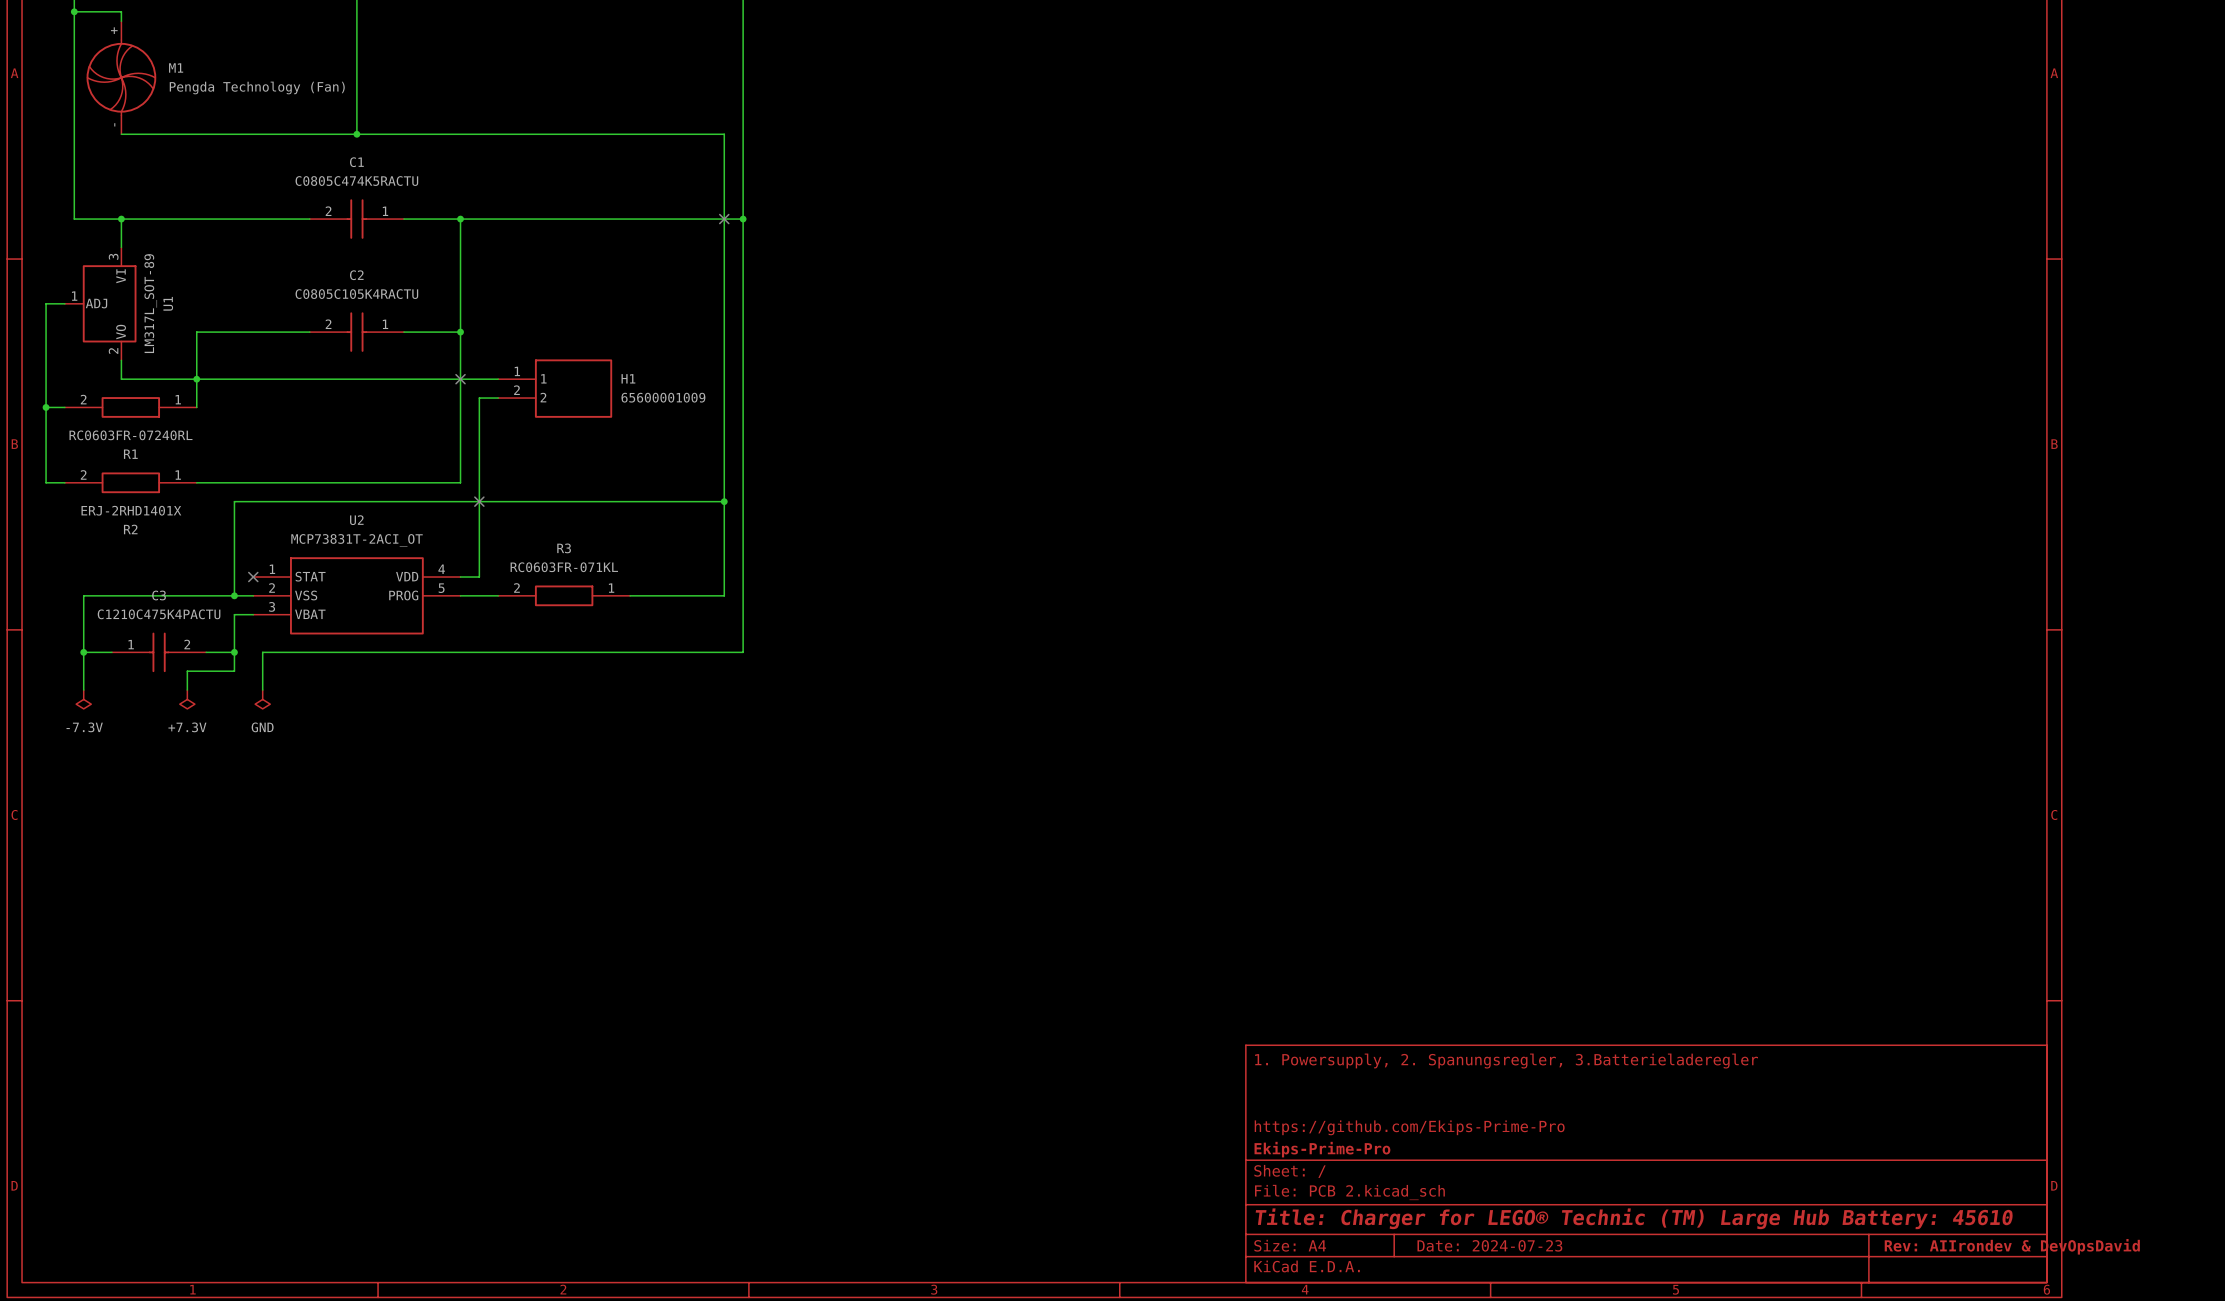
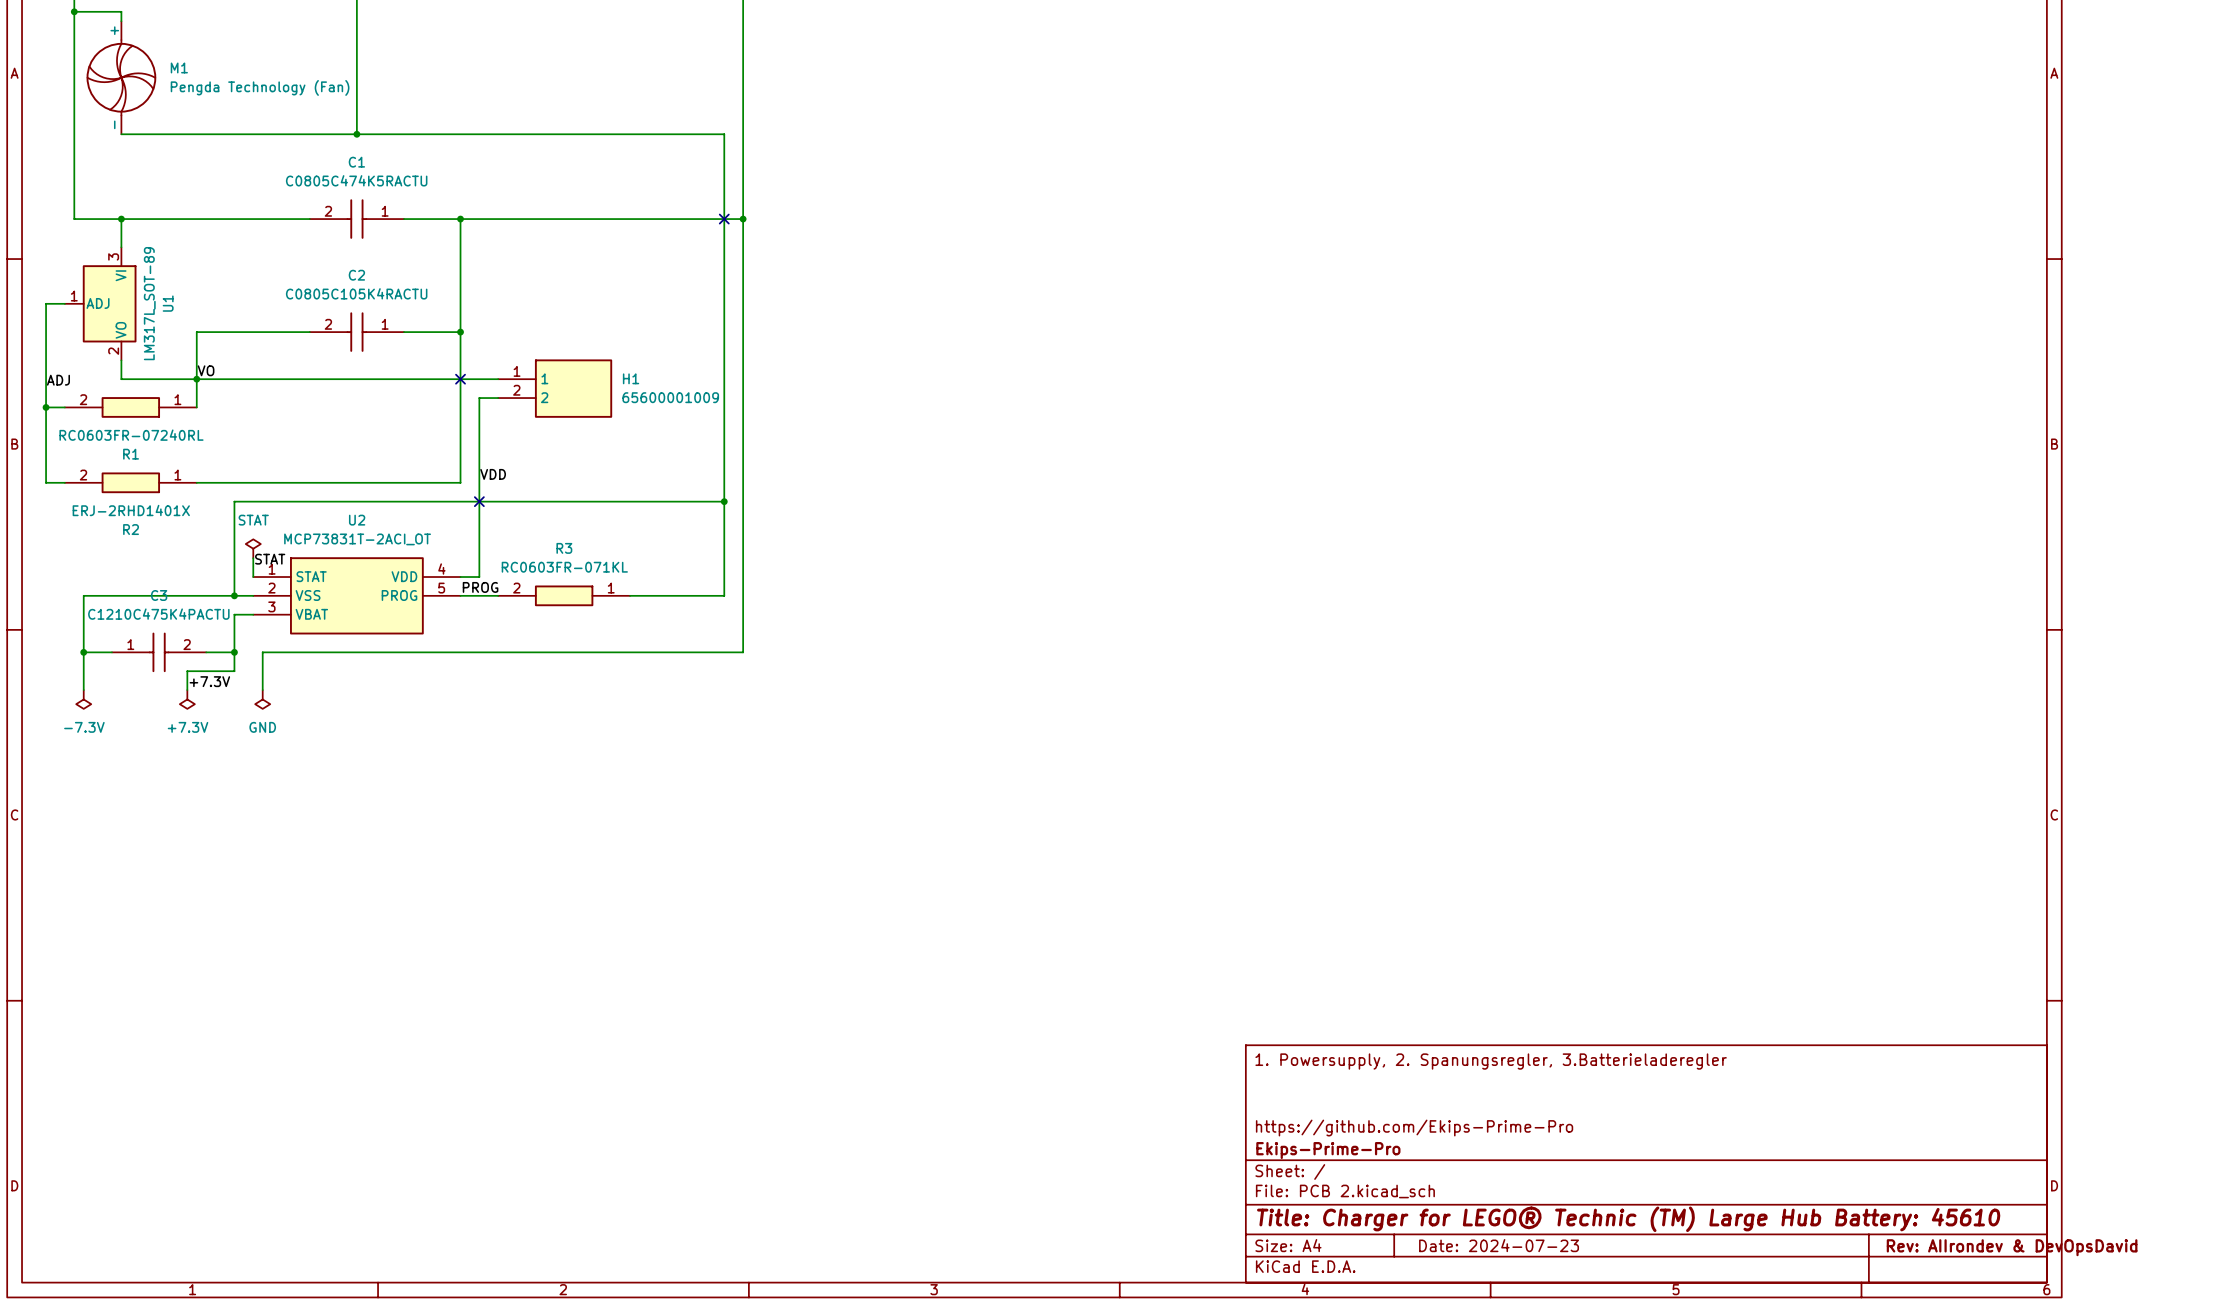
label: none -> VO (206, 370)
label: none -> ADJ (58, 380)
label: none -> VDD (493, 474)
power symbol: none -> STAT (253, 548)
wire: none -> (253, 558) (253, 577)
label: none -> STAT (270, 559)
no-connect mark: (253, 577) -> none
label: none -> PROG (480, 587)
label: none -> +7.3V (209, 681)

